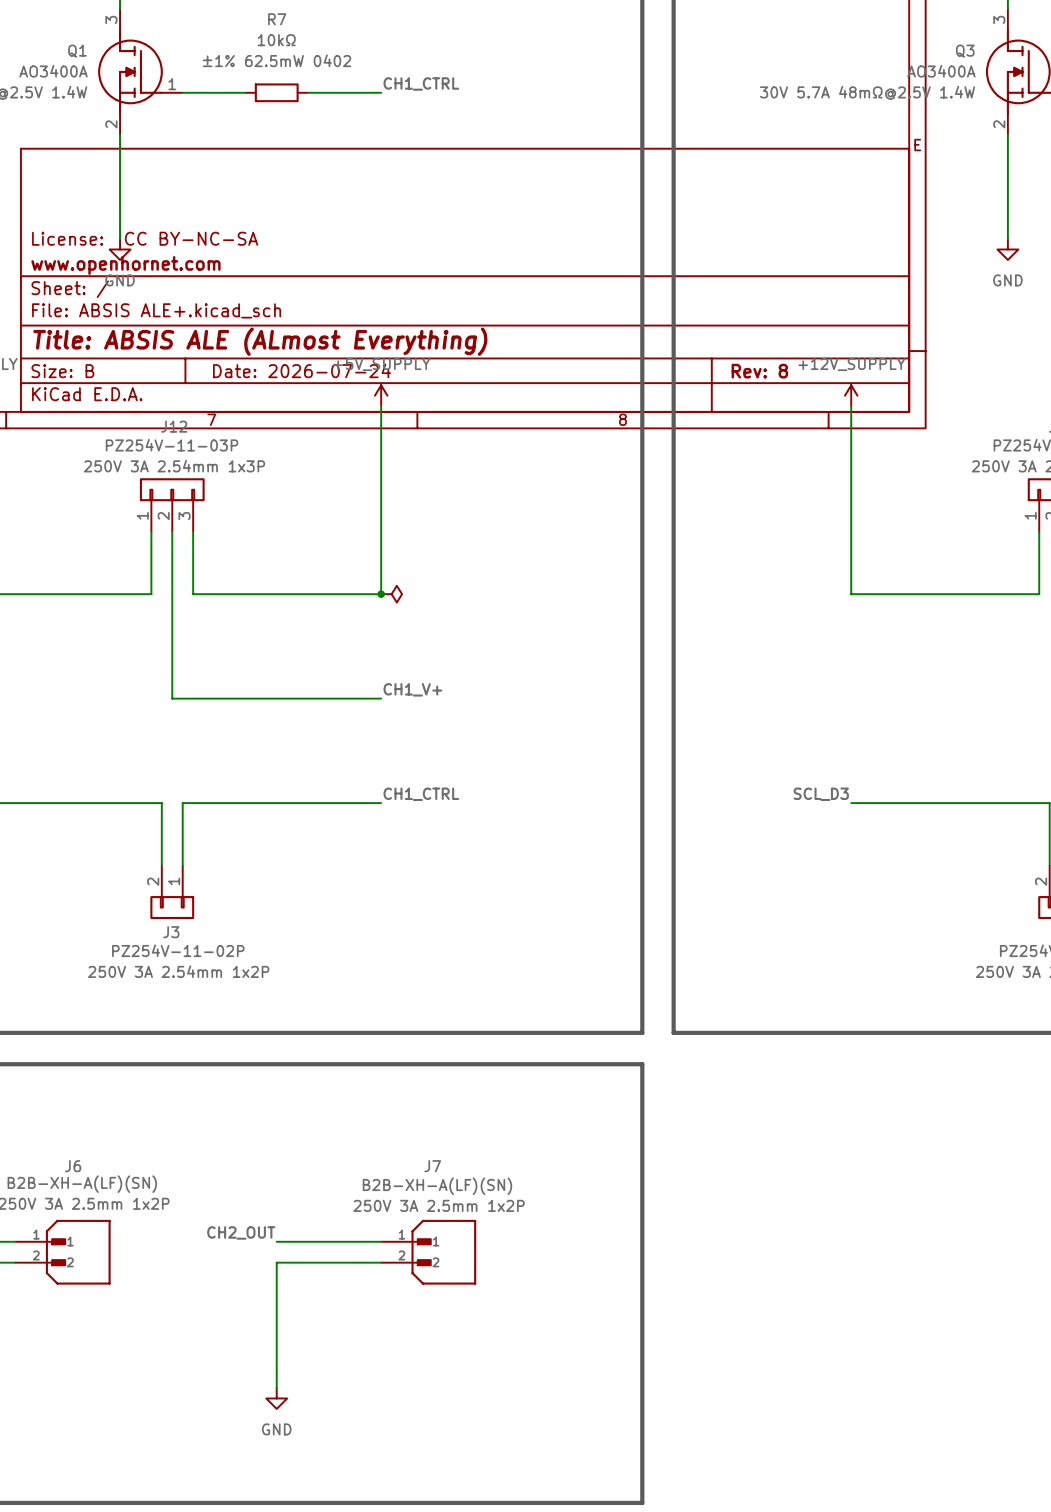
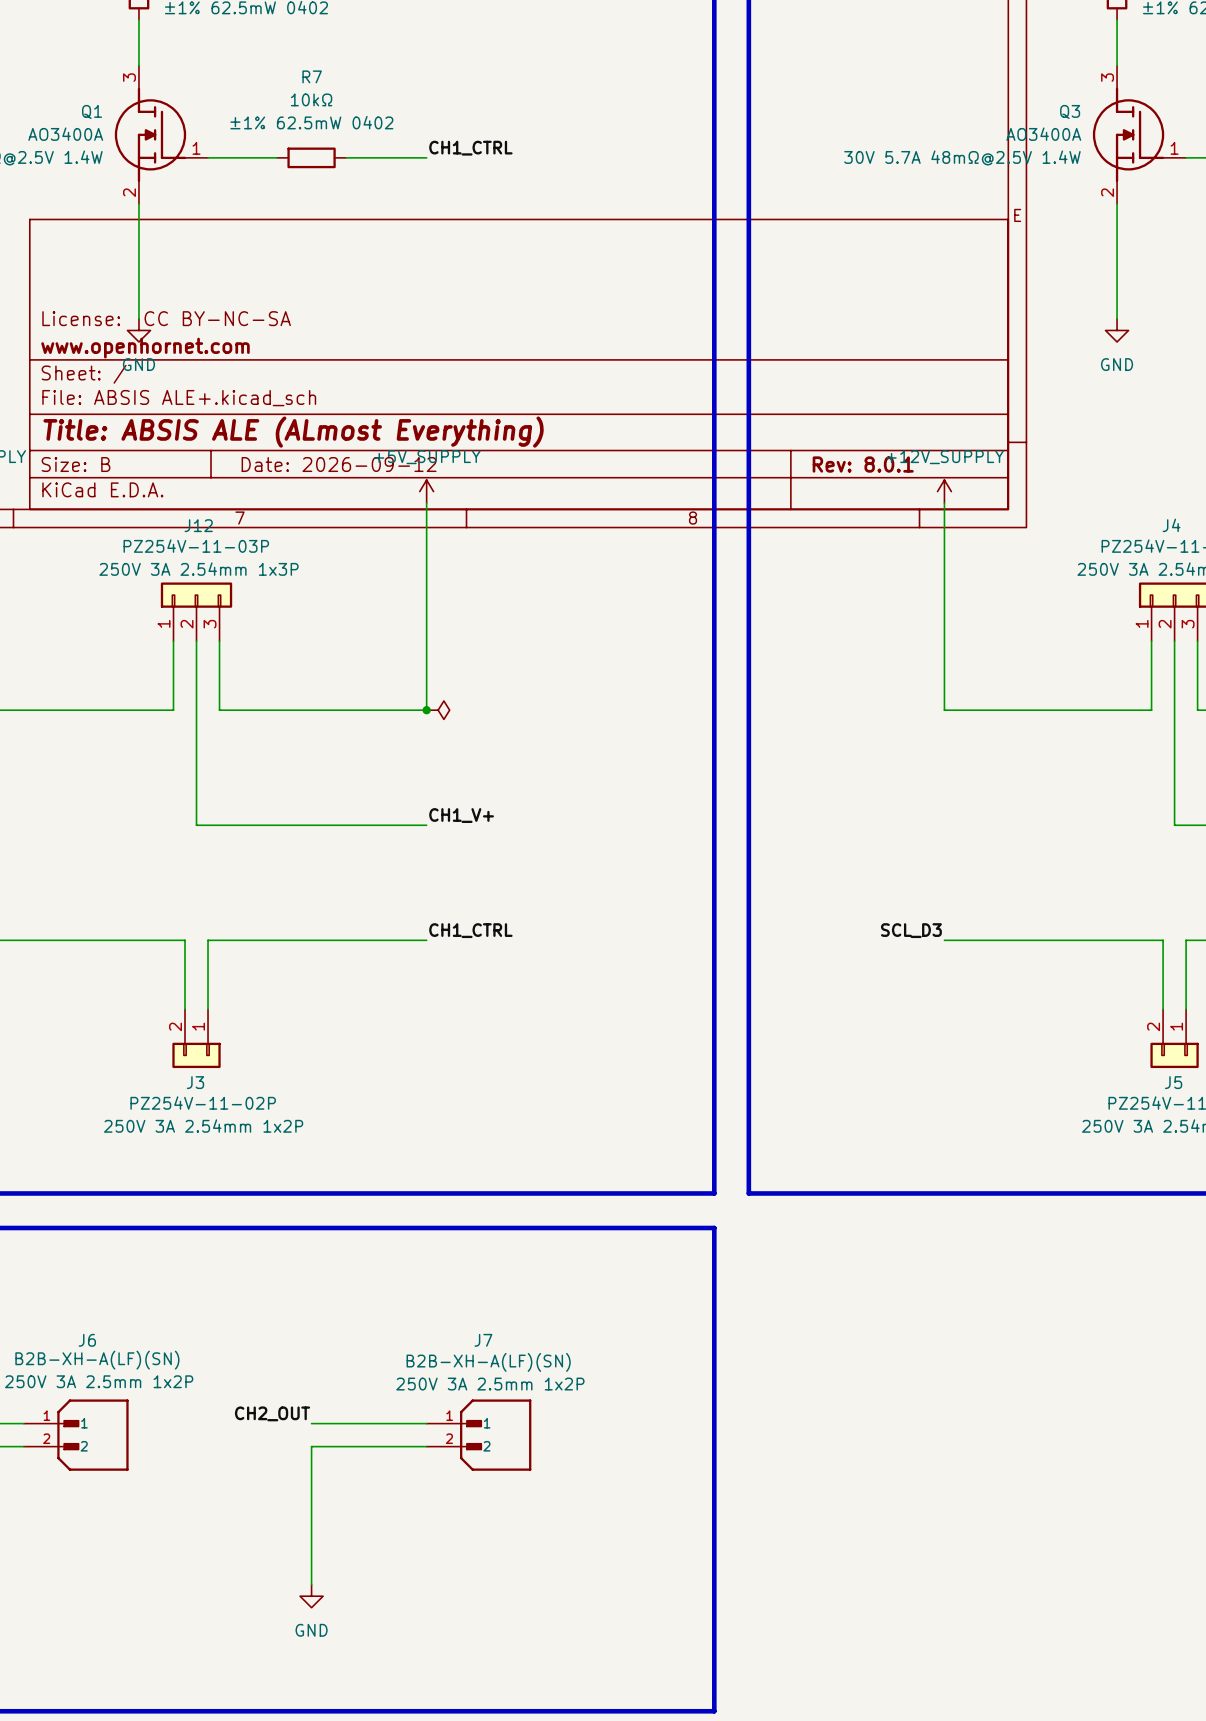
title block: Date: 2026-07-24 (301, 370) -> Date: 2026-09-12 (339, 464)
title block: Rev: 8 (759, 371) -> Rev: 8.0.1 (863, 464)

